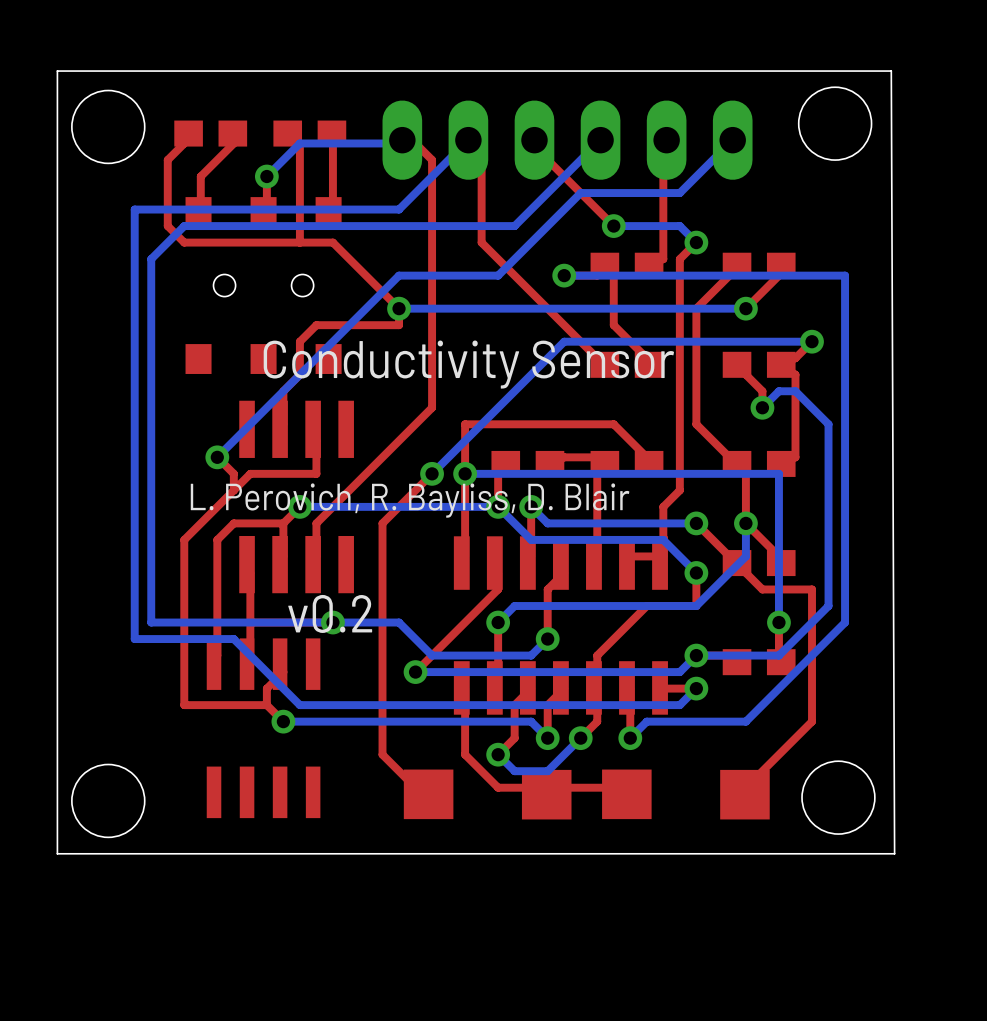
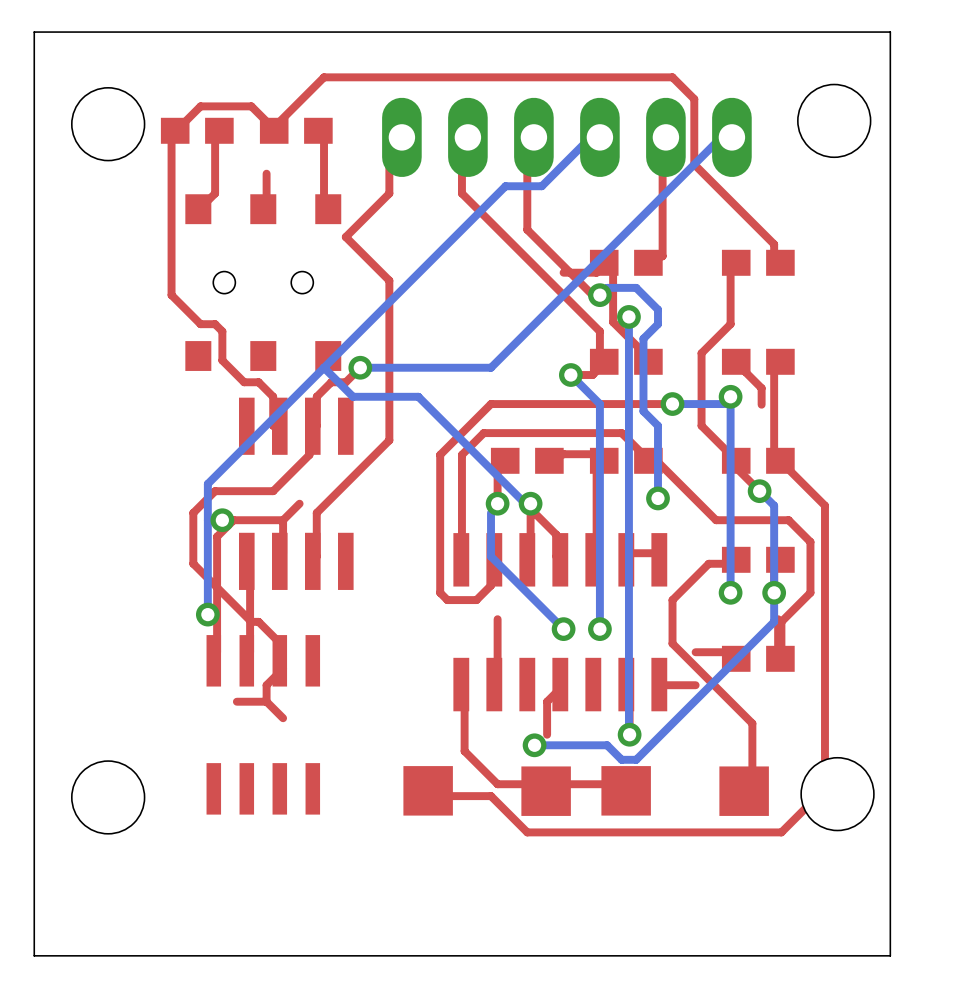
board edge: (891, 71) (57, 71) (57, 853) (894, 853) (891, 71) -> (890, 32) (890, 955) (34, 955) (34, 32) (890, 32)
top track: (188, 133) (184, 143) (167, 159) (167, 226) (184, 242) (332, 242) (399, 308) (399, 325) (316, 325) (299, 341) (299, 374) (283, 391) (283, 424) (280, 429) -> (273, 128) (251, 106) (200, 106) (171, 135) (171, 295) (200, 324) (215, 324) (222, 331) (222, 360) (244, 382) (258, 382) (273, 396) (273, 425) (279, 426)
part position: (210, 133) -> (197, 130)
top track: (232, 133) (233, 143) (200, 176) (200, 209) (198, 212) -> (219, 130) (215, 135) (215, 193) (198, 209)
top track: (287, 133) (299, 143) (299, 242) -> none
part position: (309, 133) -> (296, 130)
top track: (331, 133) (332, 209) (328, 212) -> (318, 130) (324, 135) (324, 208) (328, 209)
top track: none -> (461, 130) (461, 193) (599, 331) (599, 360) (604, 361) (592, 375) (570, 375)
top track: none -> (527, 130) (527, 229) (592, 295) (599, 295)
bottom track: none -> (593, 130) (592, 135) (541, 186) (505, 186) (207, 483) (207, 614)
bottom track: none -> (725, 130) (723, 135) (491, 367) (360, 367)
top track: (402, 140) (415, 143) (432, 159) (432, 407) (316, 523) (316, 556) (313, 564) -> (395, 130) (389, 135) (389, 193) (345, 237) (389, 280) (389, 440) (316, 512) (316, 556) (312, 561)
bottom track: (402, 140) (399, 143) (299, 143) (266, 176) -> none
top track: (468, 140) (481, 143) (481, 242) (604, 364) -> none
bottom track: (468, 140) (399, 209) (134, 209) (134, 639) (233, 639) (299, 705) (679, 705) (696, 688) -> none
top track: (534, 140) (547, 143) (547, 159) (613, 226) -> none
bottom track: (600, 140) (514, 226) (184, 226) (151, 259) (151, 622) (399, 622) (432, 655) (531, 655) (547, 639) -> none
bottom track: (732, 140) (679, 193) (580, 193) (498, 275) (399, 275) (217, 457) -> none
via: (266, 176) -> none
bottom track: (613, 226) (679, 226) (696, 242) -> none
via: (613, 226) -> none
top track: (696, 242) (679, 259) (679, 490) (663, 506) (663, 556) -> none
via: (696, 242) -> none
top track: (737, 265) (696, 308) (696, 424) (745, 473) (745, 523) (778, 556) (781, 563) -> (736, 262) (730, 266) (730, 324) (701, 353) (701, 425) (736, 460) (730, 462) (759, 491)
top track: (781, 265) (778, 275) (745, 308) -> (780, 262) (774, 258) (774, 244) (694, 164) (694, 99) (672, 77) (324, 77) (273, 128)
bottom track: (564, 275) (845, 275) (845, 622) (745, 721) (646, 721) (630, 738) -> none
via: (564, 275) -> none
bottom track: none -> (599, 295) (607, 287) (636, 287) (657, 309) (657, 324) (643, 338) (643, 411) (657, 425) (657, 498)
via: none -> (599, 295)
via: (399, 308) -> none
bottom track: (745, 308) (399, 308) -> none
via: (745, 308) -> none
bottom track: none -> (628, 316) (628, 730)
via: none -> (628, 316)
top track: (812, 341) (795, 358) (781, 364) (795, 374) (795, 457) (781, 463) -> none
bottom track: (812, 341) (564, 341) (432, 473) -> none
via: (812, 341) -> none
text: Conductivity Sensor (468, 364) -> none
top track: none -> (780, 361) (774, 367) (774, 454) (824, 505) (824, 788) (781, 832) (527, 832) (491, 796) (440, 796) (438, 790)
bottom track: none -> (324, 367) (353, 396) (418, 396) (527, 505)
top track: none -> (360, 367) (345, 382) (331, 382) (316, 396) (316, 425) (312, 426) (309, 433) (309, 454) (273, 491) (215, 491) (193, 512) (193, 563) (251, 621) (258, 621) (280, 643)
via: none -> (360, 367)
bottom track: none -> (570, 375) (599, 404) (599, 629)
via: none -> (570, 375)
bottom track: none -> (730, 396) (730, 592)
via: none -> (672, 404)
bottom track: none -> (730, 404) (672, 404)
bottom track: (762, 407) (778, 391) (795, 391) (828, 424) (828, 606) (778, 655) (696, 655) (679, 672) (415, 672) -> none
via position: (762, 407) -> (730, 396)
top track: (313, 429) (316, 440) (316, 473) (250, 473) (184, 539) (184, 705) (237, 705) -> none
top track: (217, 457) (233, 473) (233, 490) -> none
via: (217, 457) -> none
top track: (649, 463) (646, 457) (613, 424) (465, 424) (465, 556) (461, 563) -> (780, 658) (781, 621) (810, 592) (810, 542) (788, 520) (716, 520) (650, 454) (648, 460) (621, 433) (483, 433) (461, 454) (461, 559)
top track: (432, 473) (382, 523) (382, 754) (415, 787) (428, 794) -> none
via: (432, 473) -> none
bottom track: (465, 473) (778, 473) (778, 622) -> none
via: (465, 473) -> none
bottom track: none -> (759, 491) (774, 505) (774, 621) (636, 759) (621, 759) (607, 745) (534, 745)
text: L. Perovich, R. Bayliss, D. Blair (410, 500) -> none
via: none -> (657, 498)
bottom track: (299, 506) (498, 506) (531, 539) (663, 539) (696, 572) -> none
via: (299, 506) -> none
bottom track: (531, 506) (547, 523) (696, 523) -> none
bottom track: none -> (491, 512) (491, 556) (563, 629)
via: none -> (222, 520)
top track: (696, 523) (762, 589) (812, 589) (812, 721) (745, 787) (744, 794) -> none
via: (696, 523) -> none
bottom track: (745, 523) (745, 556) (696, 606) (514, 606) (498, 622) -> none
via position: (745, 523) -> (759, 491)
top track: (494, 563) (498, 572) (498, 589) (415, 672) -> (494, 559) (491, 563) (491, 585) (476, 600) (447, 600) (440, 592) (440, 454) (491, 404) (672, 404)
top track: (560, 563) (564, 572) (547, 589) (547, 639) -> (560, 559) (556, 556) (556, 534) (527, 505)
top track: none -> (736, 559) (730, 563) (708, 563) (672, 600) (672, 643) (752, 723) (752, 788) (754, 791)
top track: (696, 572) (696, 606) (646, 606) (597, 655) (597, 672) (593, 687) (597, 688) (597, 721) (580, 738) -> none
via: (696, 572) -> none
via: none -> (730, 592)
text: v0.2 (330, 613) -> none
via: none -> (207, 614)
via: (332, 622) -> none
via: (498, 622) -> none
via position: (778, 622) -> (774, 592)
via: none -> (599, 629)
via position: (547, 639) -> (563, 629)
via: (696, 655) -> none
via: (415, 672) -> none
top track: (527, 687) (531, 688) (514, 705) (514, 738) (498, 754) -> none
via: (696, 688) -> none
bottom track: (283, 721) (531, 721) (547, 738) -> none
via: (283, 721) -> none
via position: (547, 738) -> (534, 745)
bottom track: (580, 738) (547, 771) (514, 771) (498, 754) -> none
via: (580, 738) -> none
via: (498, 754) -> none

